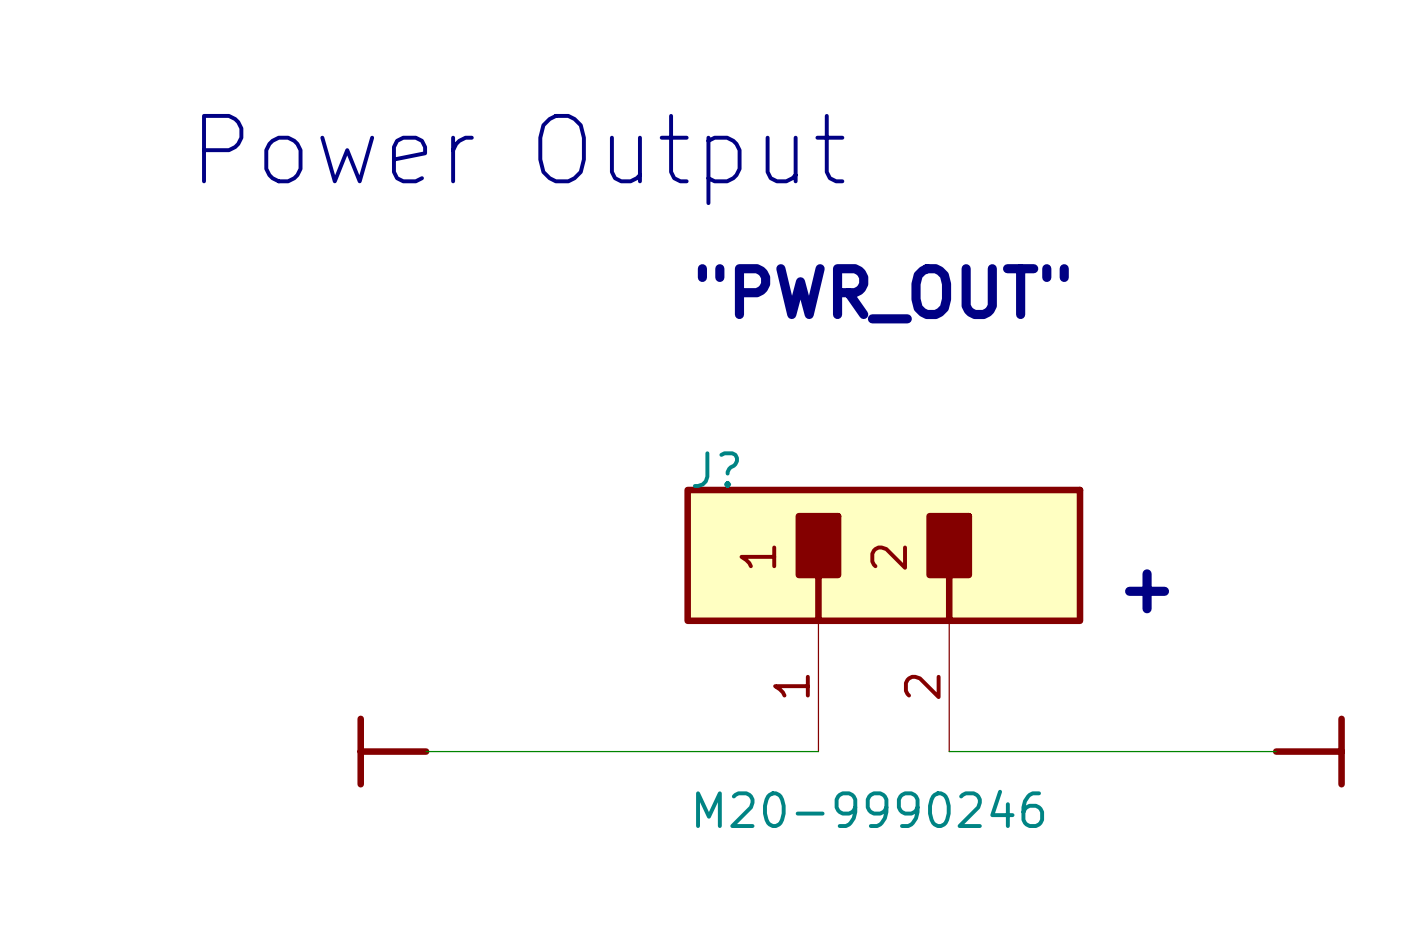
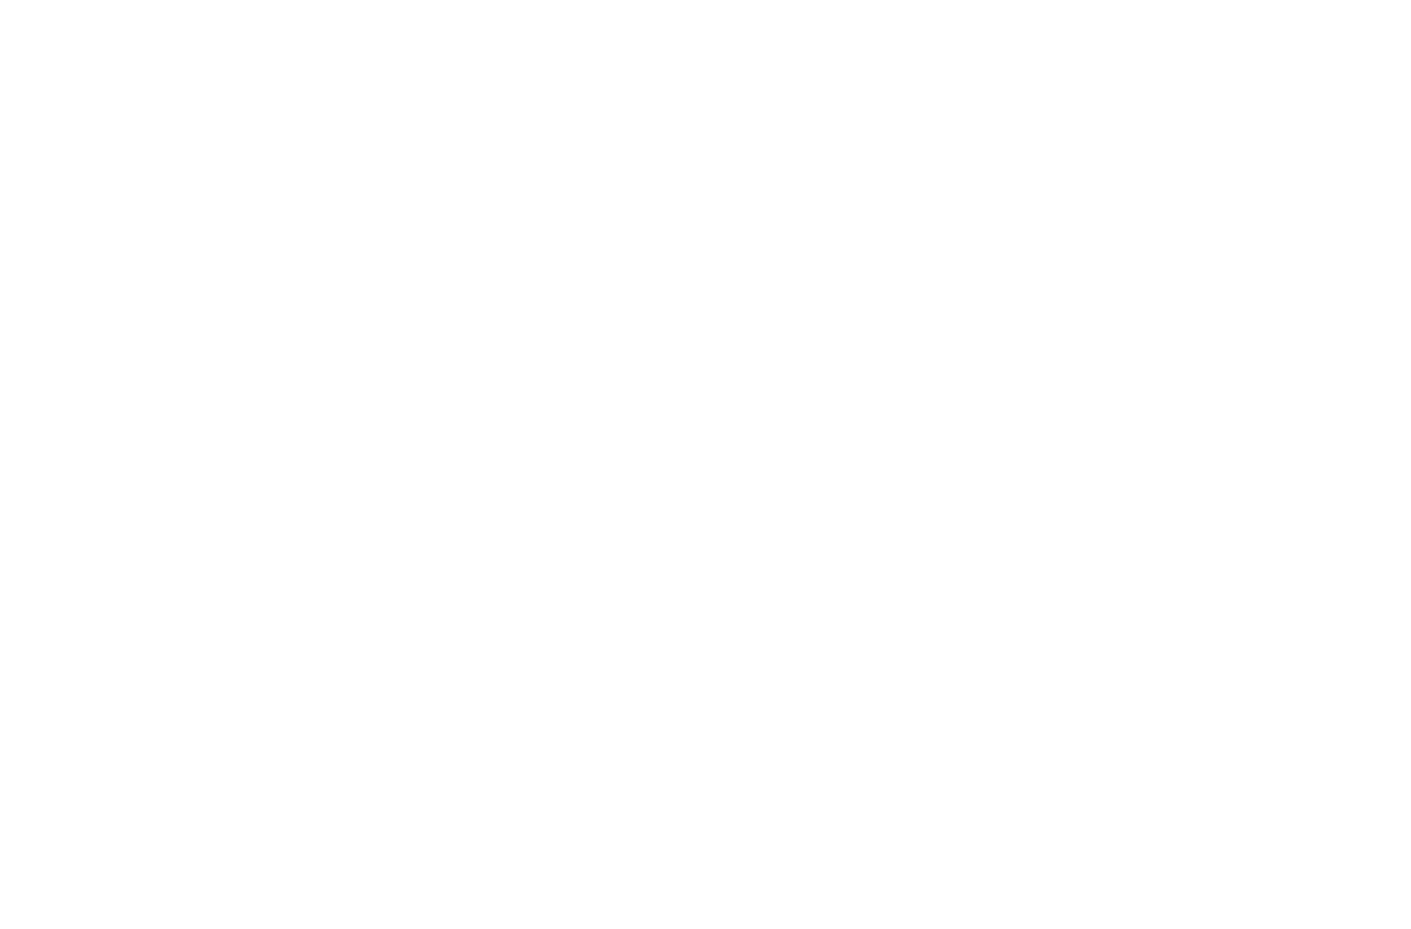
text: Power Output (523, 159) -> none
text: "PWR_OUT" (883, 293) -> none
text: + (1147, 591) -> none
J?: M20-9990246 (883, 619) -> none
power symbol: (393, 751) -> none
wire: (426, 751) (818, 751) -> none
wire: (949, 751) (1276, 751) -> none
power symbol: (1308, 751) -> none

